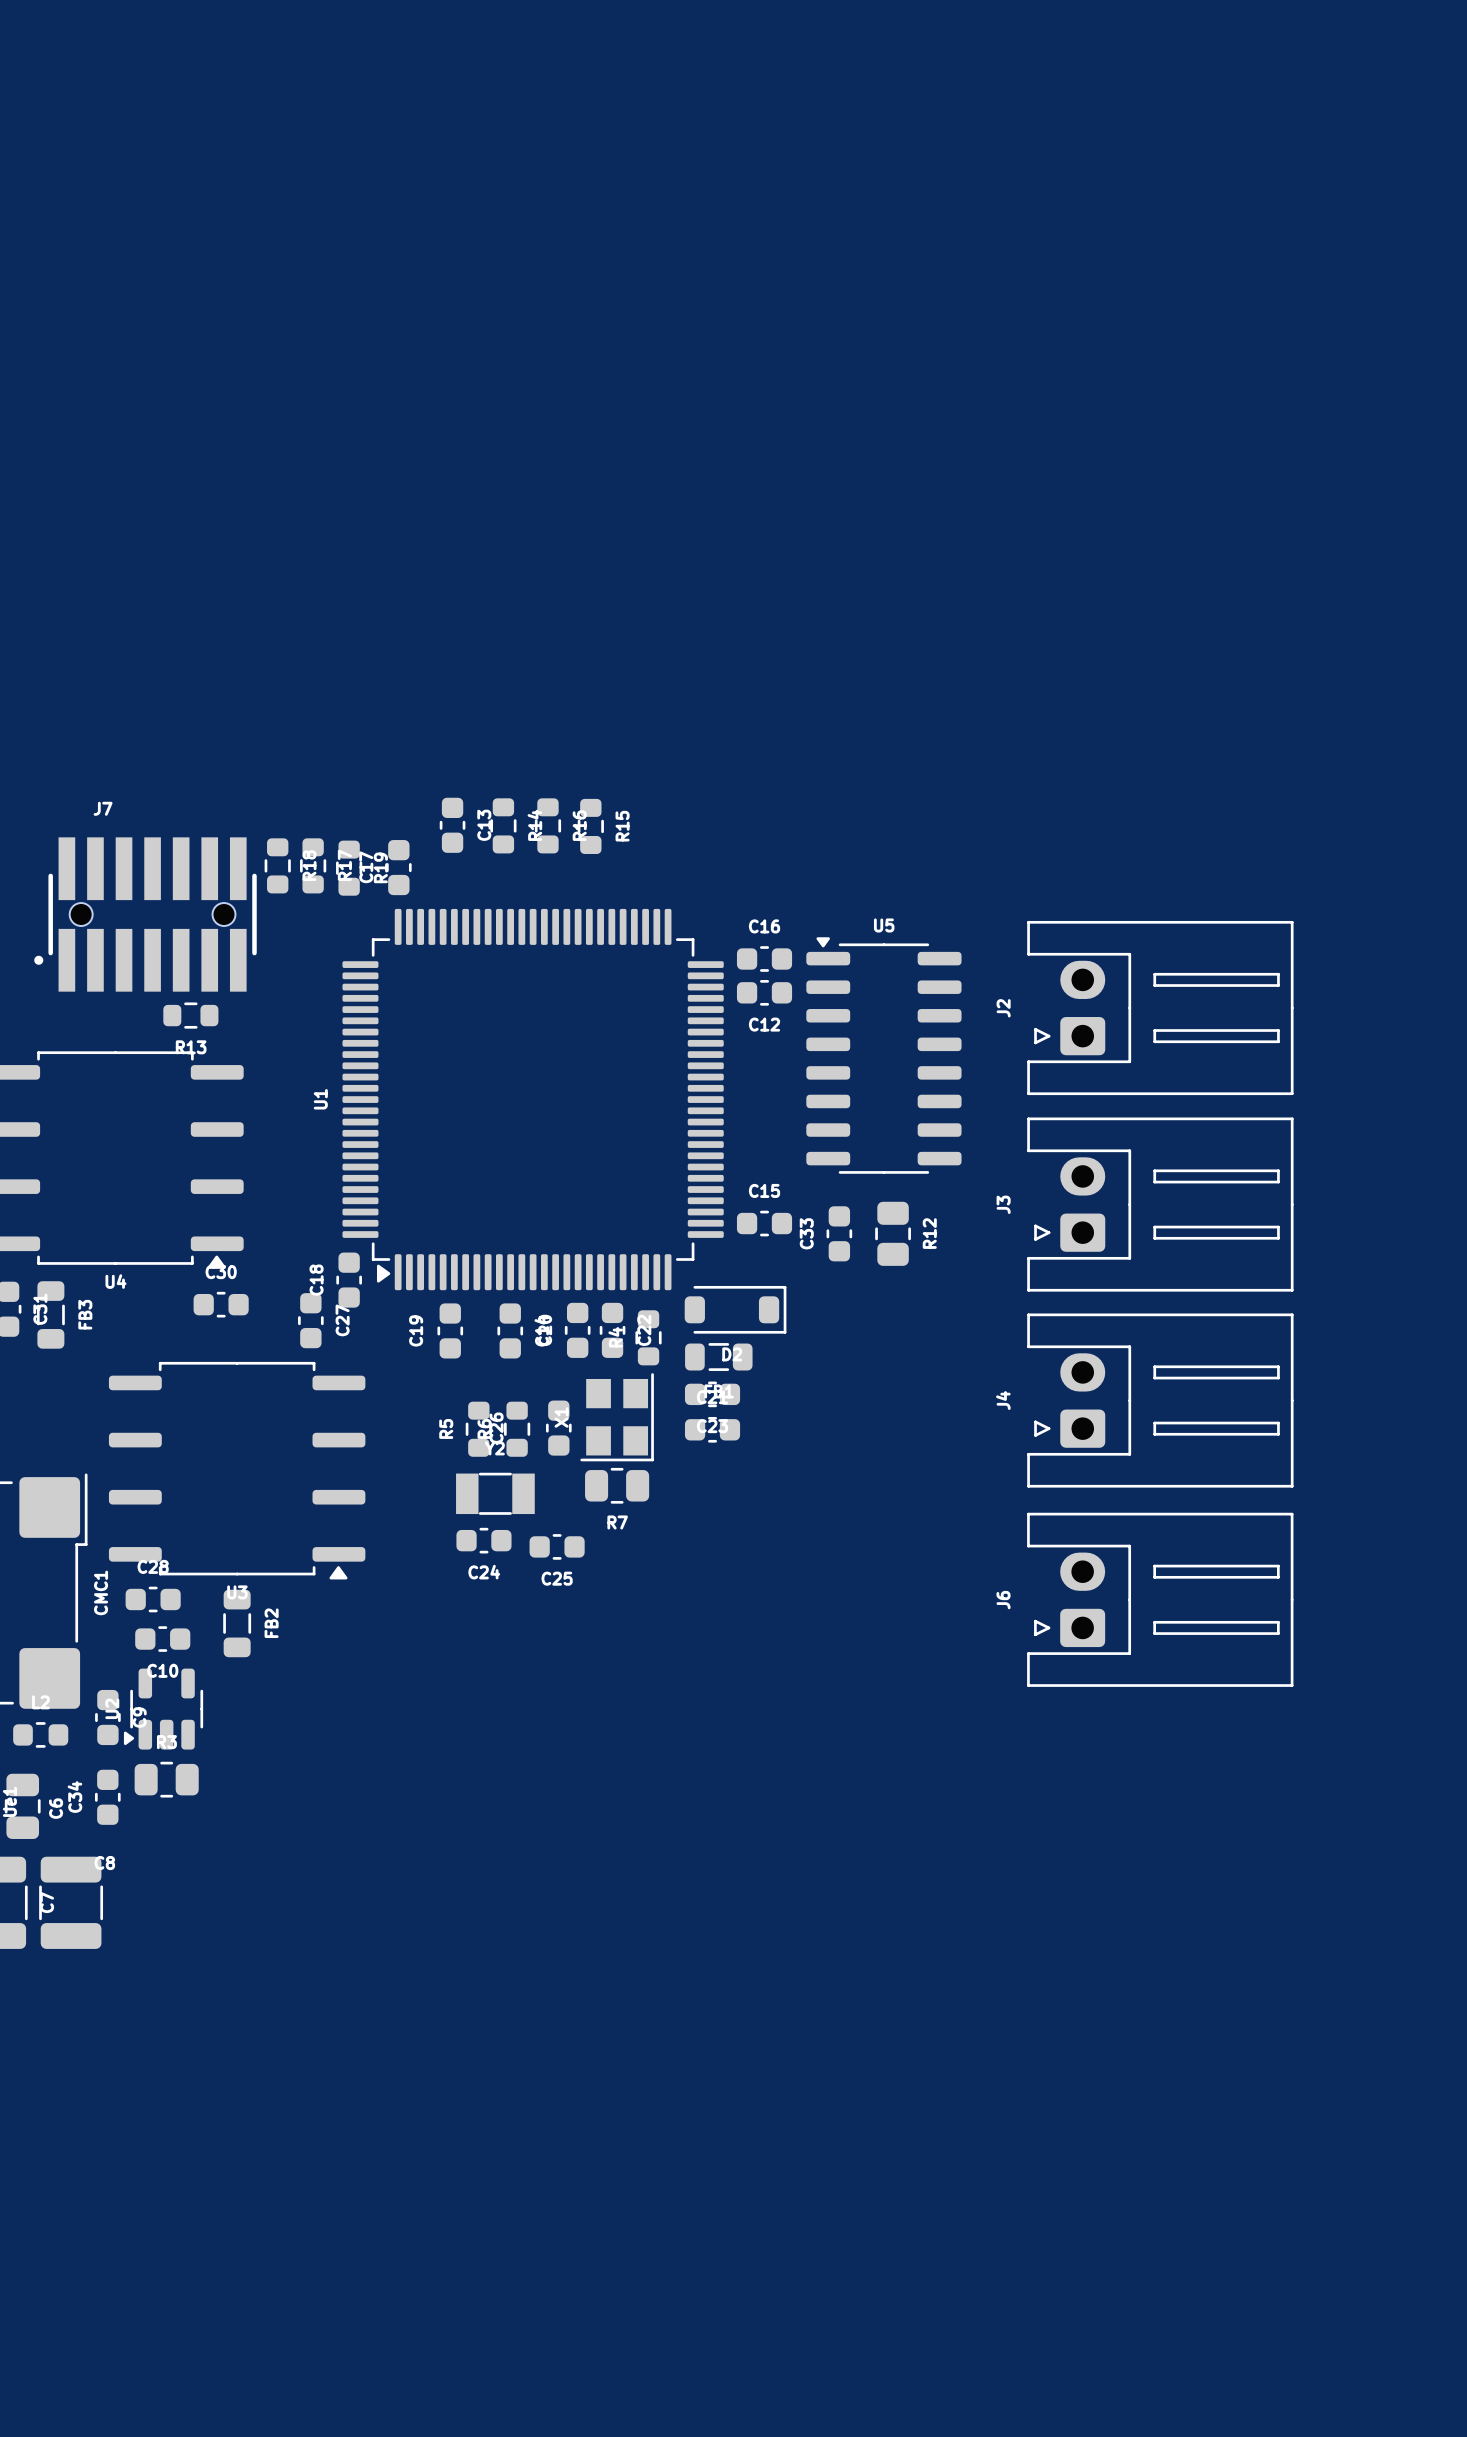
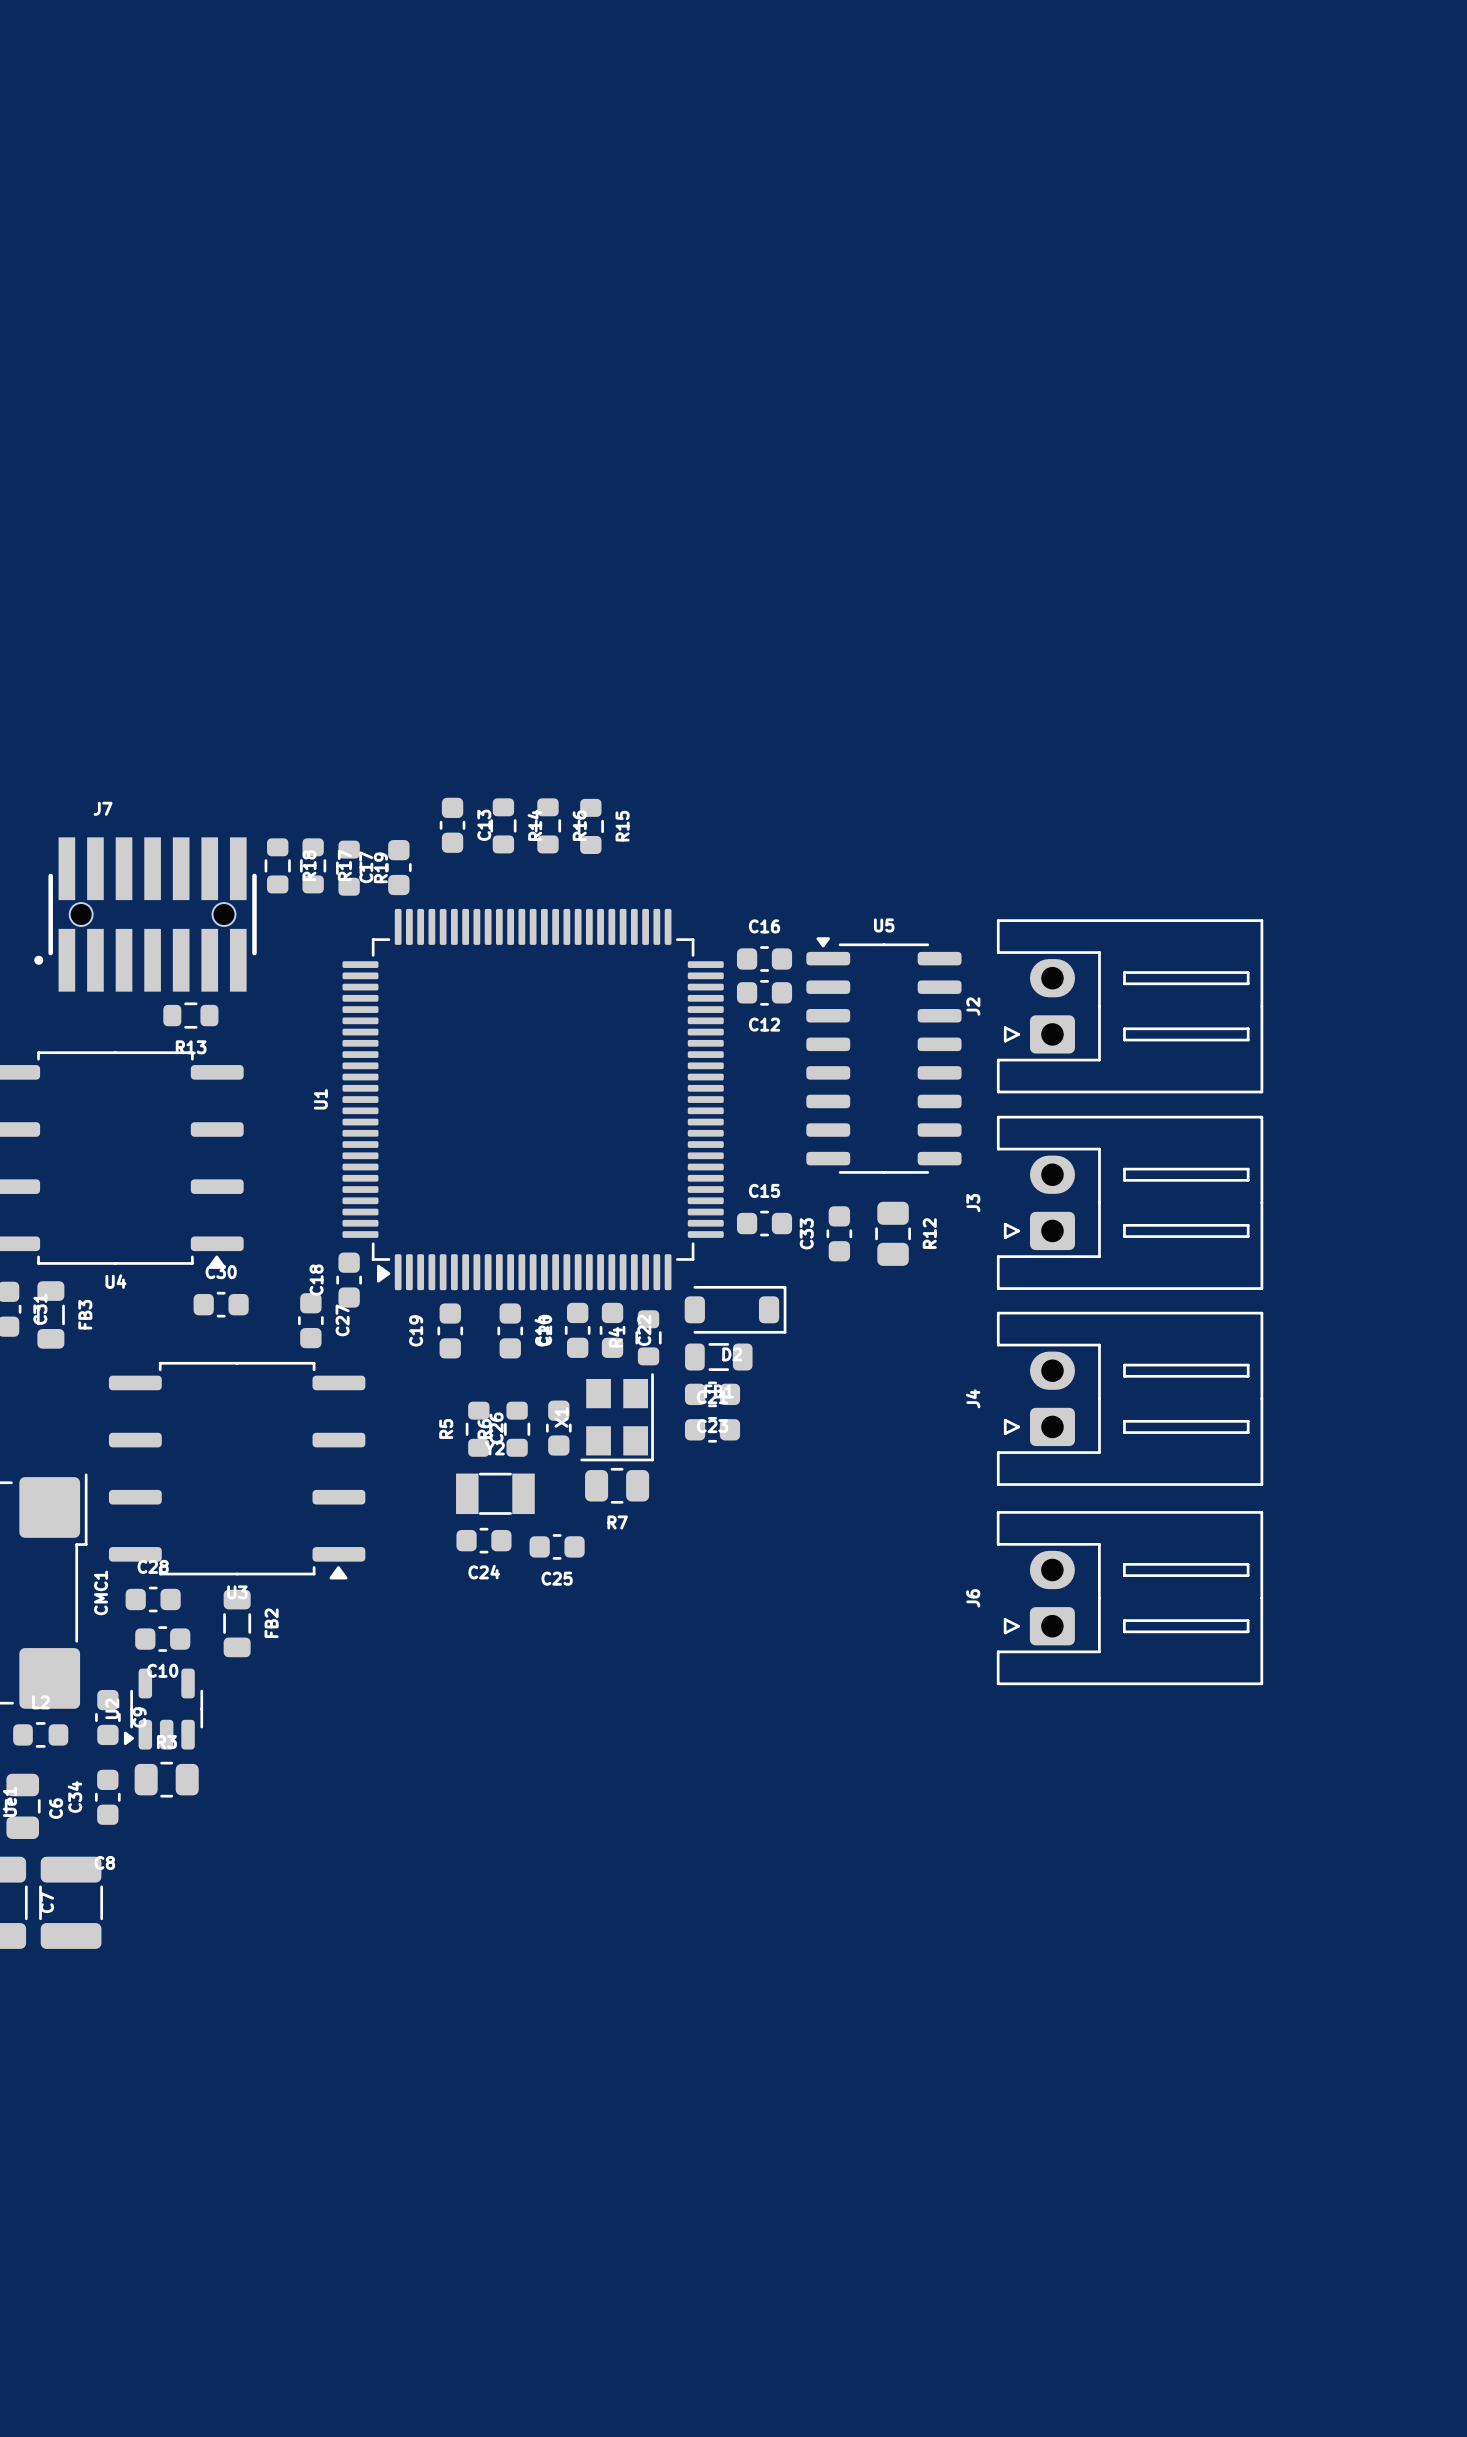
J2 position: (1160, 1008) -> (1130, 1006)
J3 position: (1160, 1204) -> (1130, 1202)
J4 position: (1160, 1400) -> (1130, 1398)
J6 position: (1160, 1599) -> (1129, 1598)

